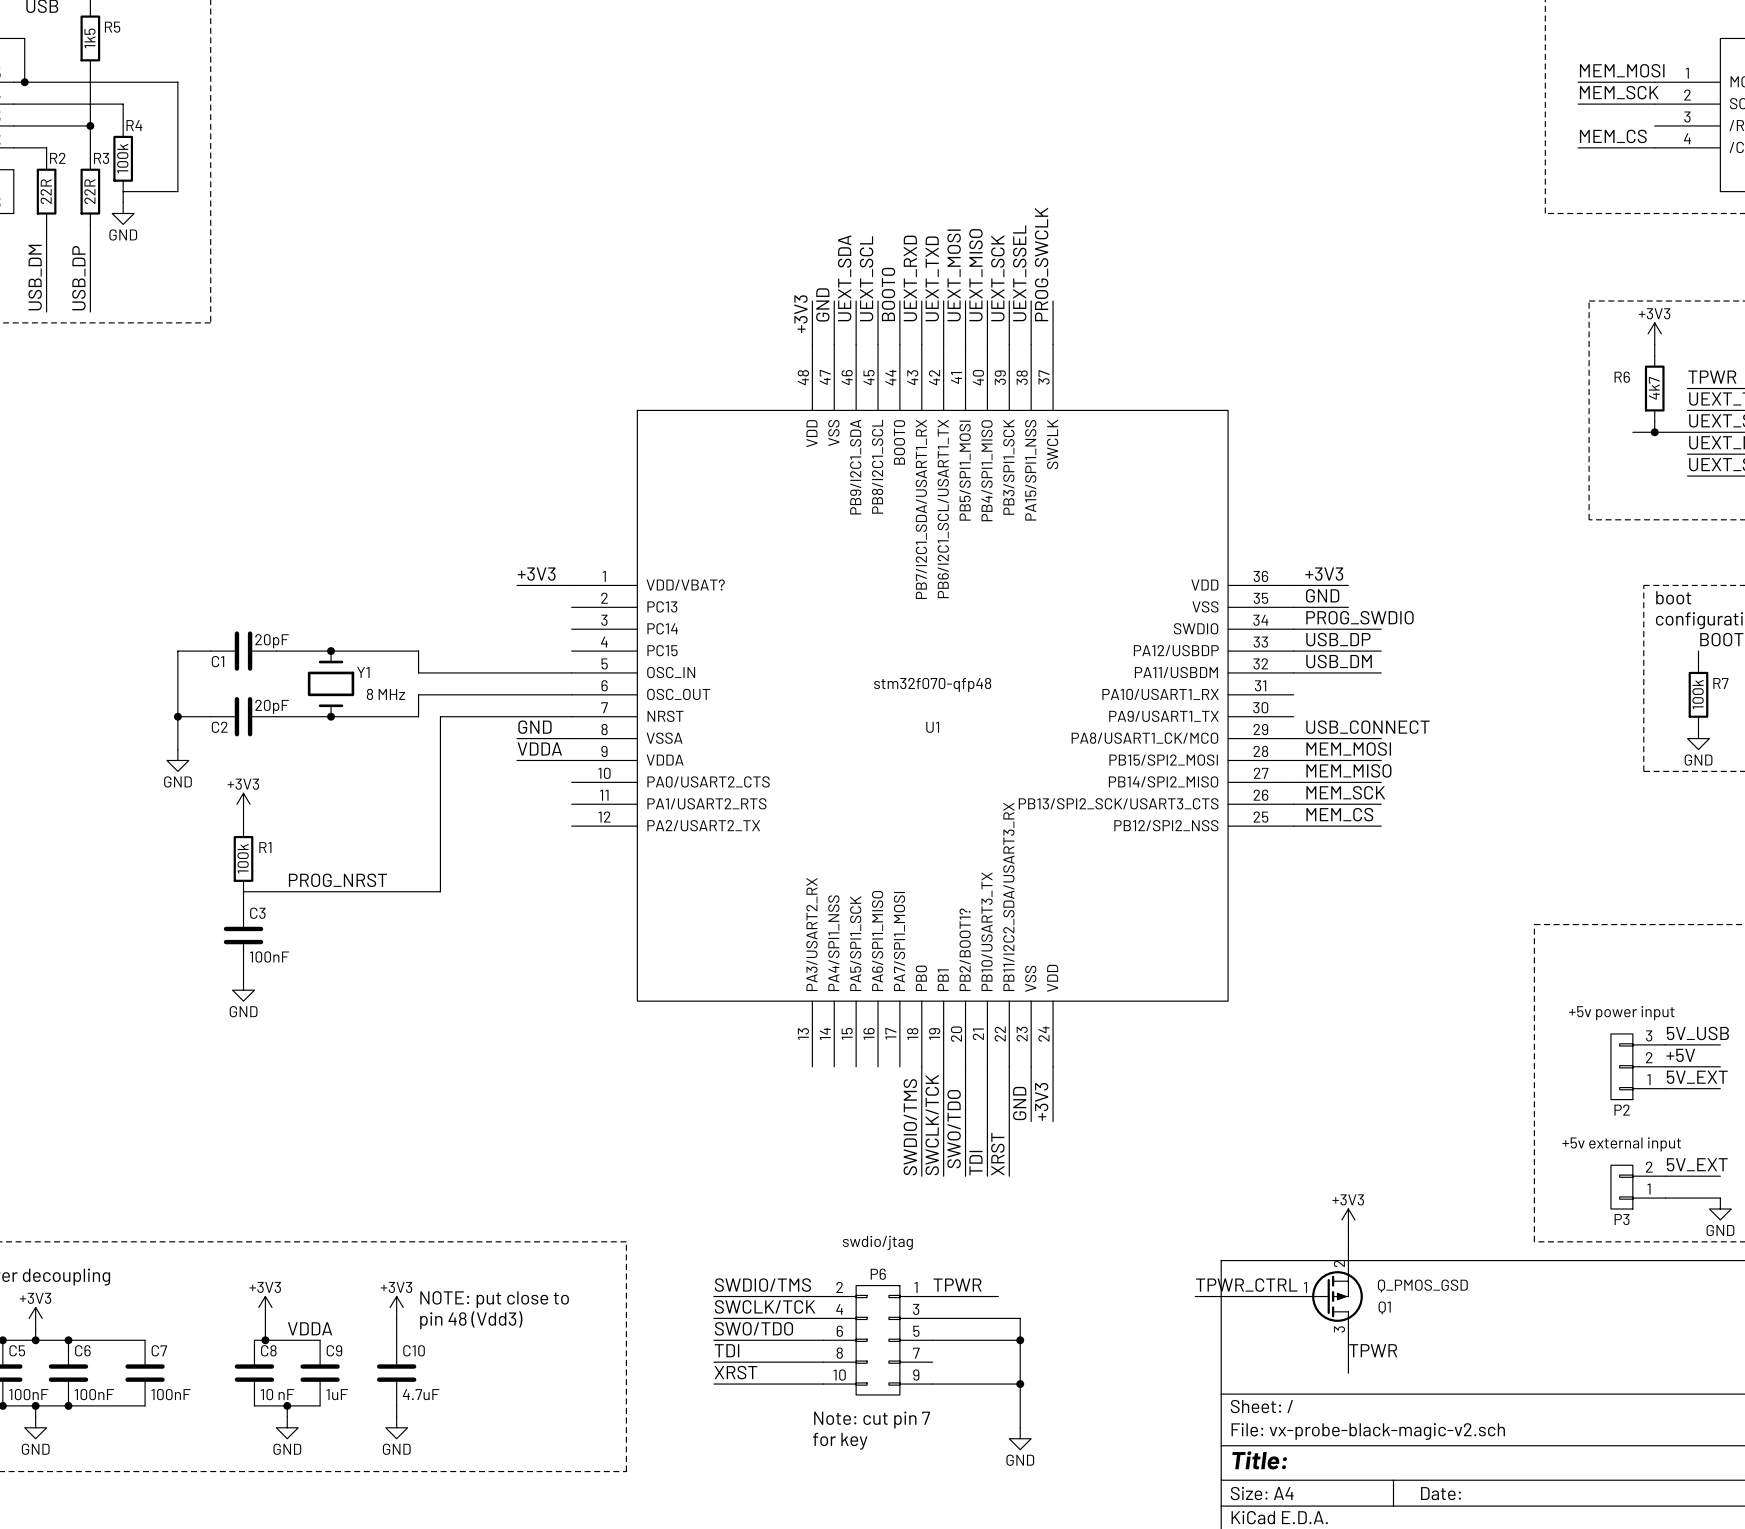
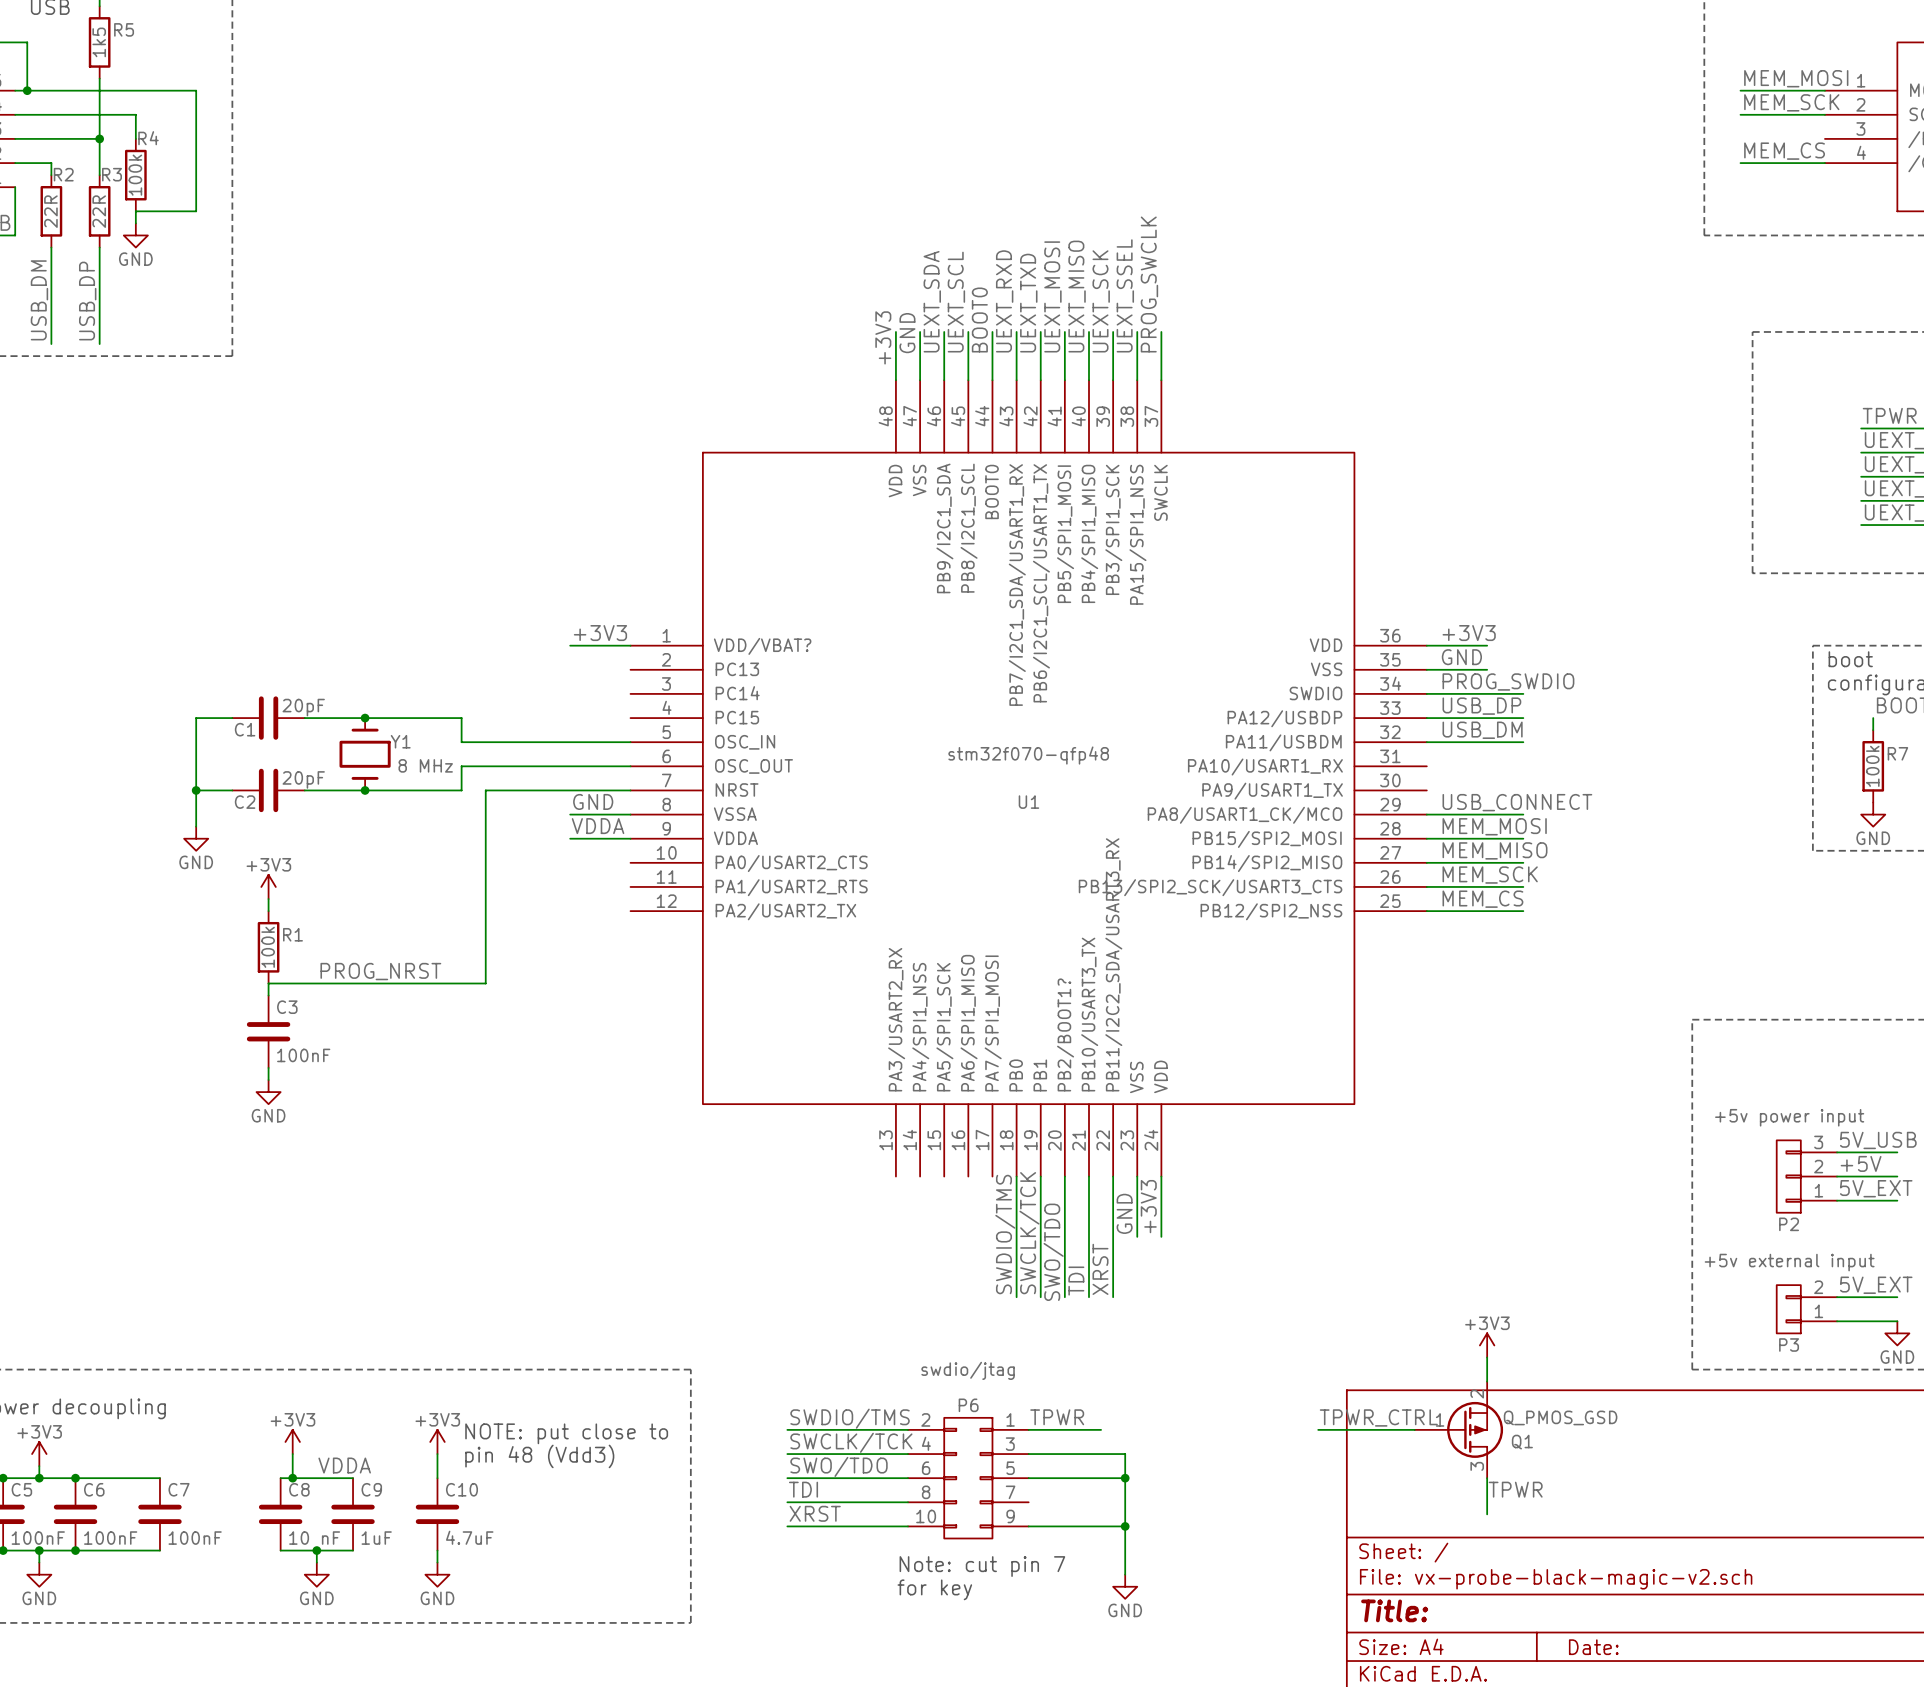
power symbol: +3V3 (1654, 333) -> none
wire: (1654, 344) (1654, 355) -> none
R6: 4k7 (1654, 388) -> none
wire: (1654, 421) (1654, 432) -> none
wire: (1632, 432) (1687, 432) -> none
junction: (1654, 432) -> none

